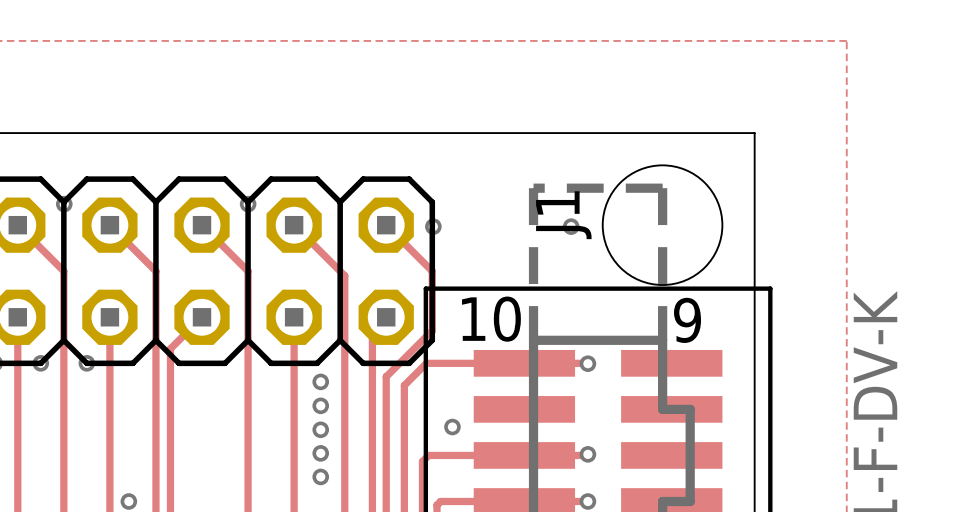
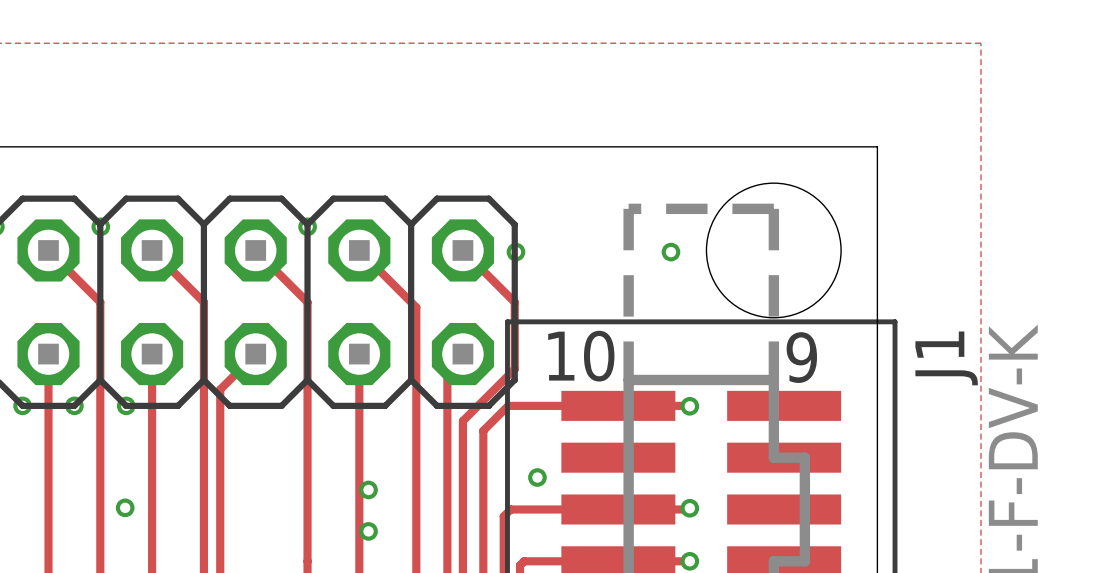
J1 name position: J1 (563, 215) -> J1 (946, 358)
via: (320, 381) -> none
via: (320, 405) -> none
via: (320, 429) -> none
via: none -> (368, 489)
via: (320, 453) -> none
via: none -> (125, 507)
via: none -> (368, 531)
via: (320, 476) -> none
via: (128, 501) -> none

